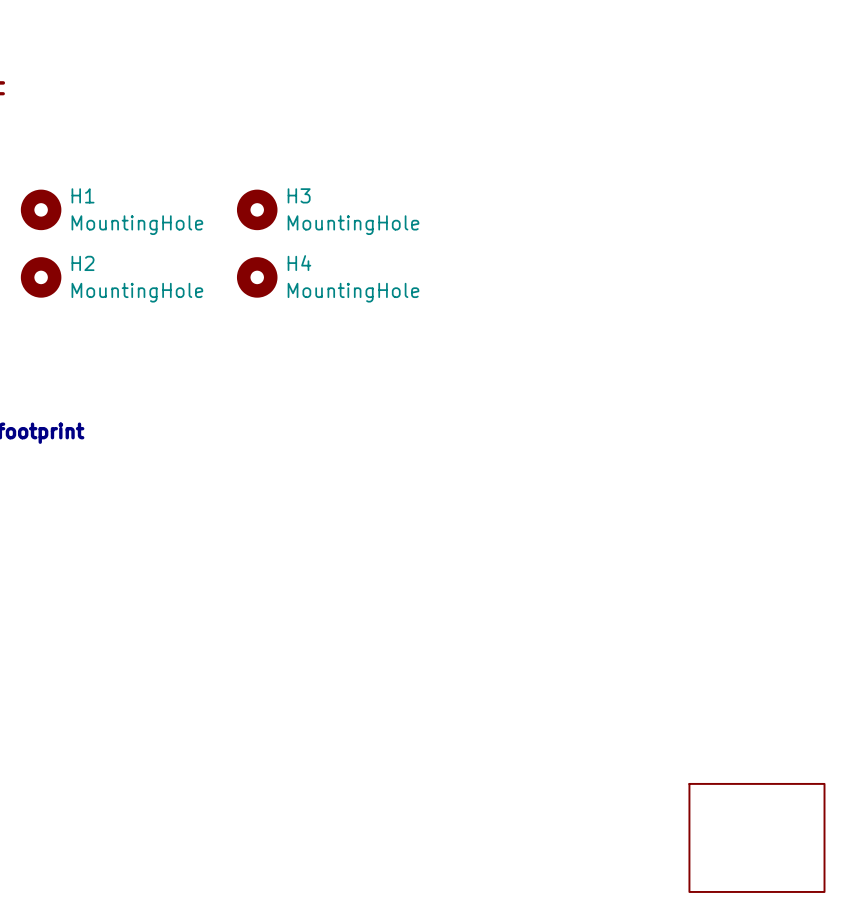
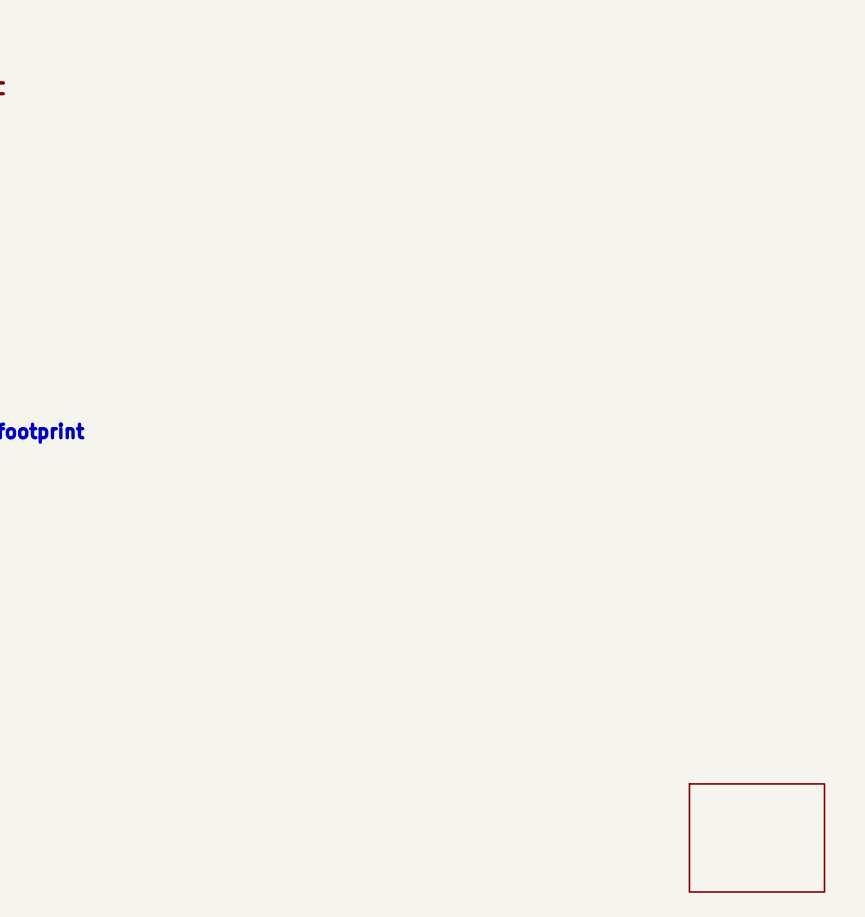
H1: MountingHole (41, 209) -> none
H3: MountingHole (257, 209) -> none
H2: MountingHole (41, 277) -> none
H4: MountingHole (257, 277) -> none

